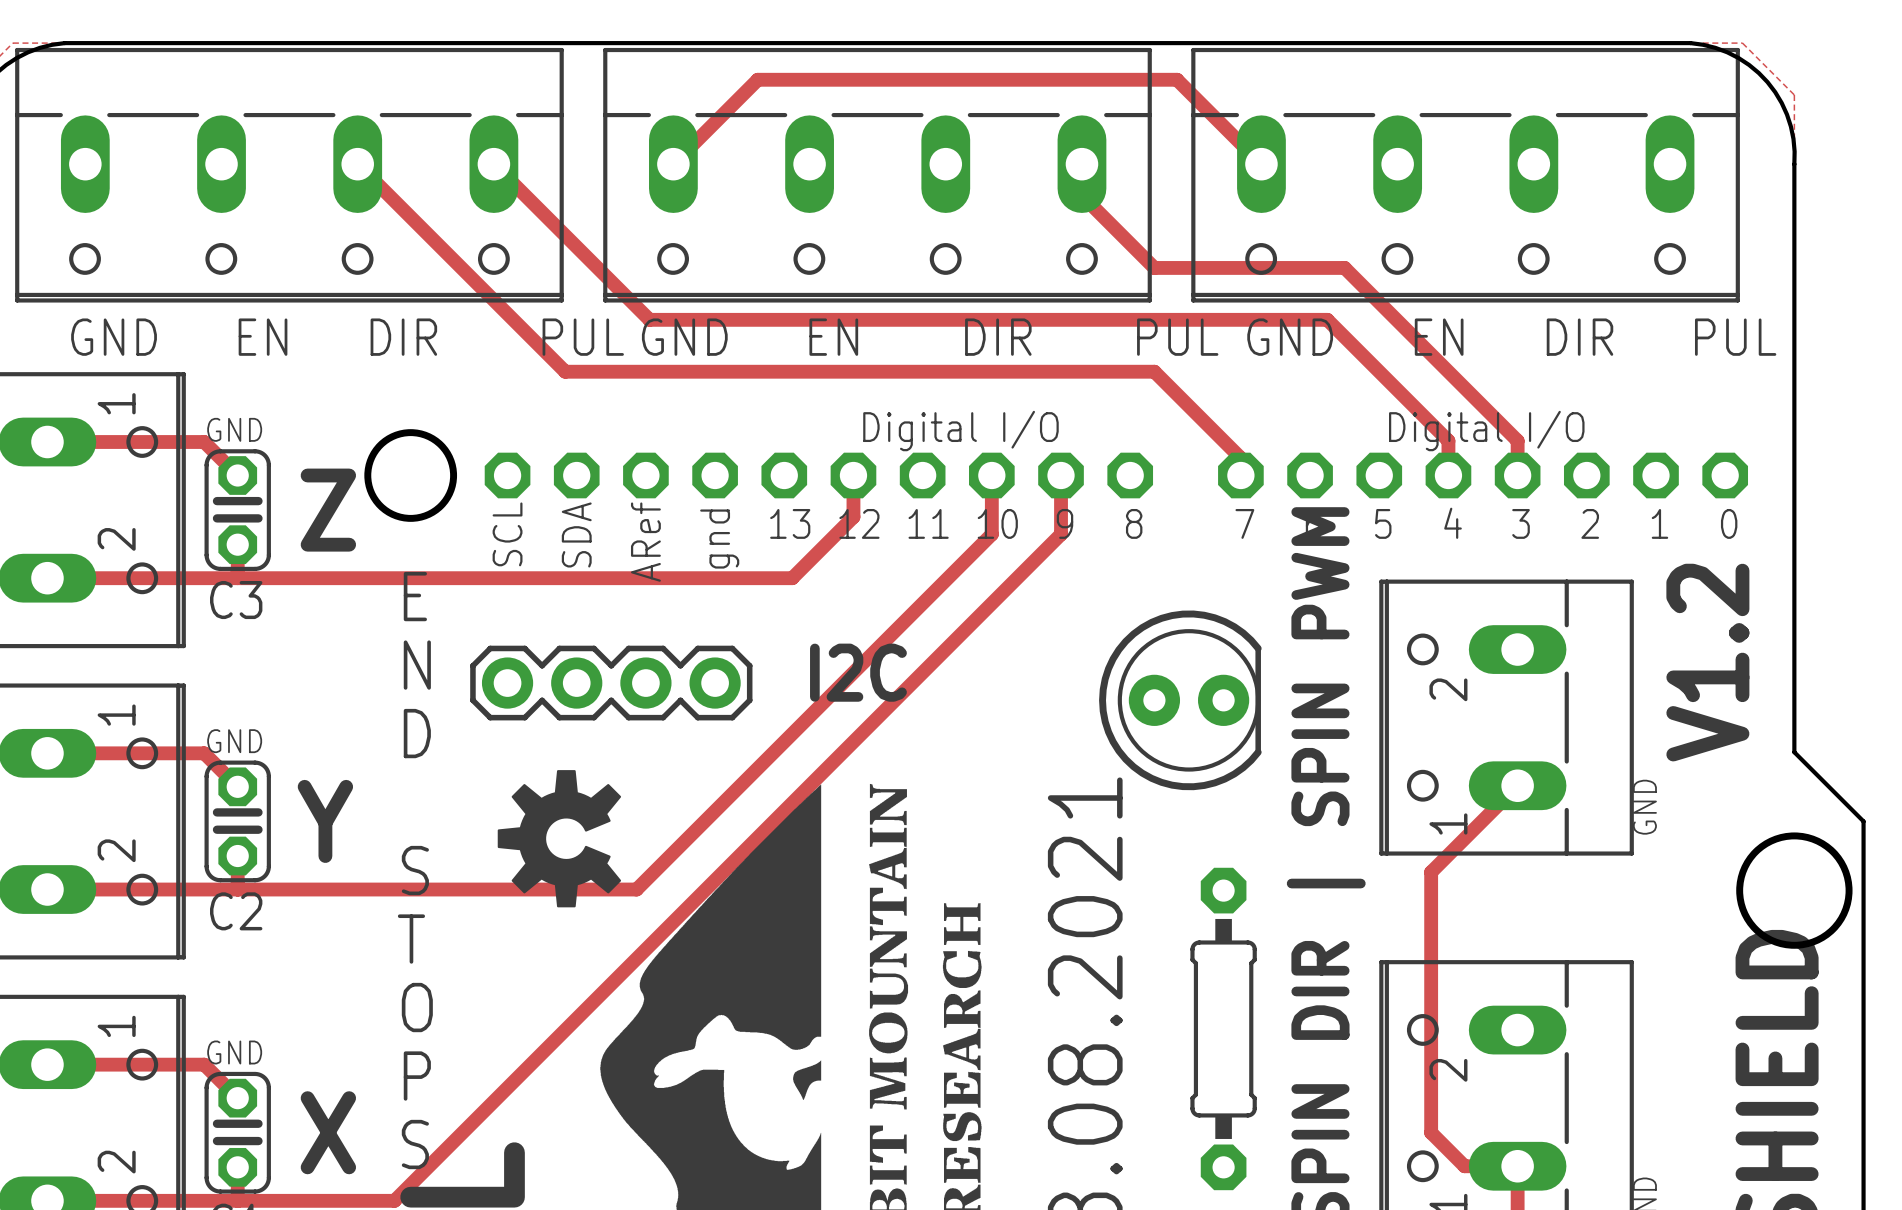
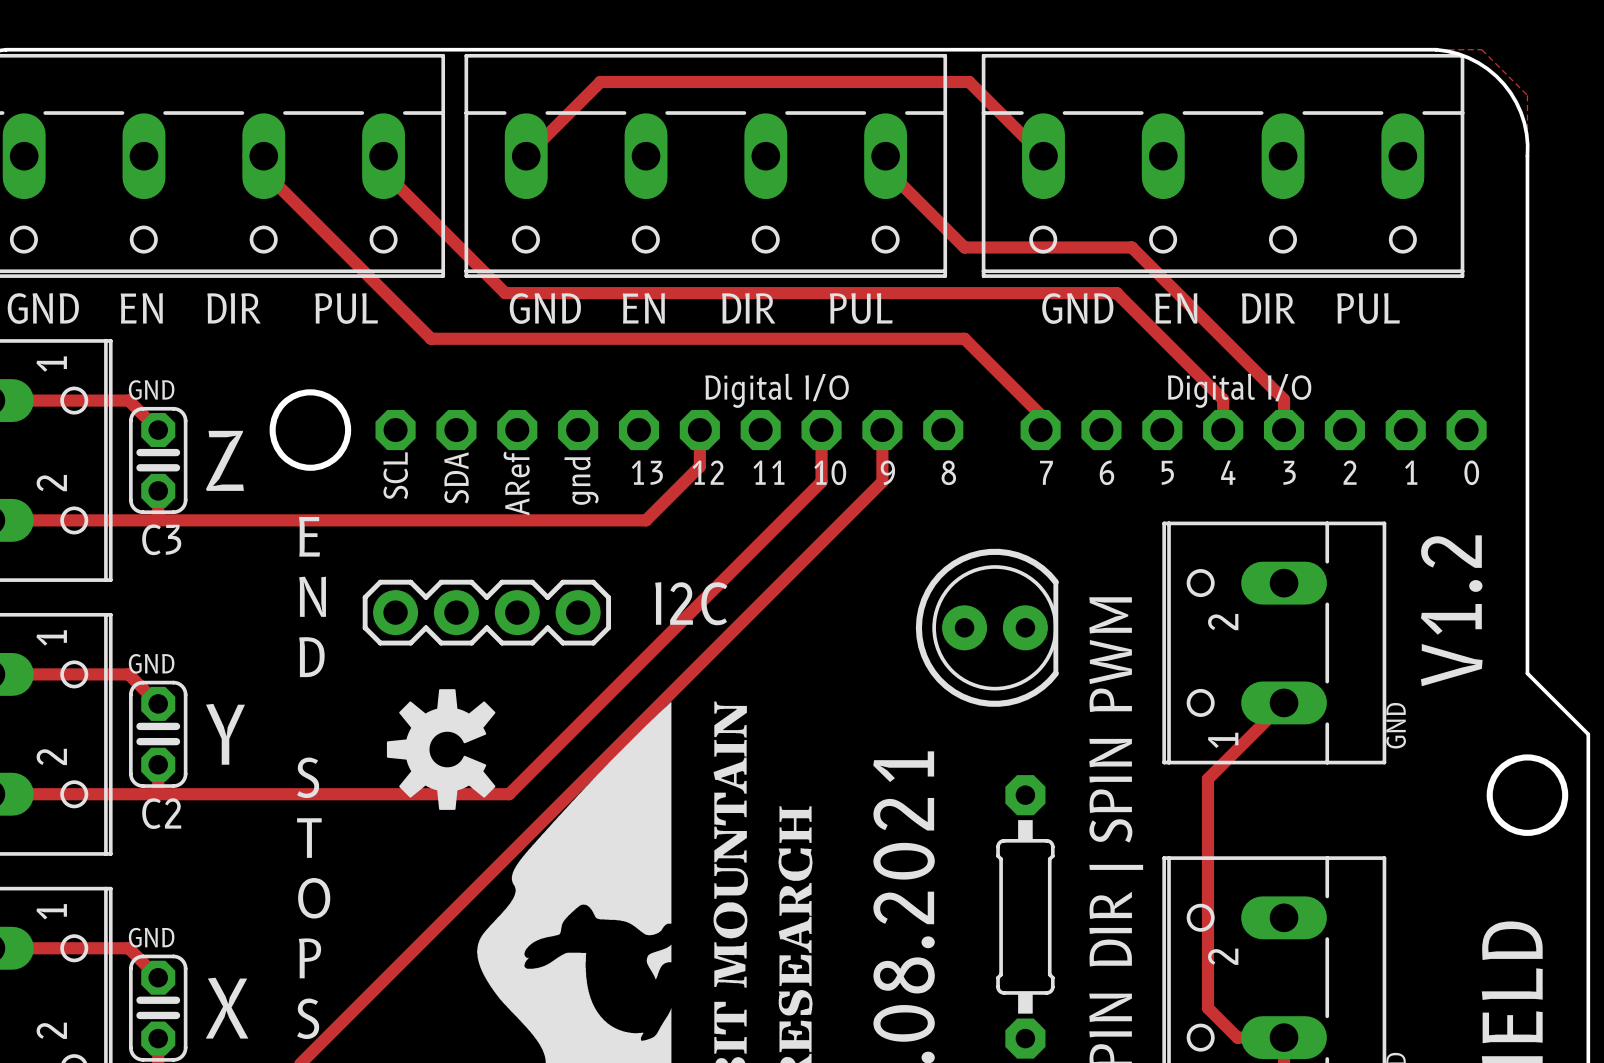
track: (757, 79) (673, 164) -> (615, 81) (600, 81) (526, 156)
track: (1159, 79) (1177, 79) (1261, 164) -> (969, 81) (1043, 156)
track: (357, 164) (565, 371) -> (248, 156) (431, 338) (446, 338)
track: (493, 164) (649, 319) -> (368, 156) (505, 293) (520, 293)
part position: (877, 175) -> (705, 165)
part position: (1465, 175) -> (1223, 165)
round board edge size: [1736, 832, 1853, 949] -> [1486, 754, 1569, 836]

